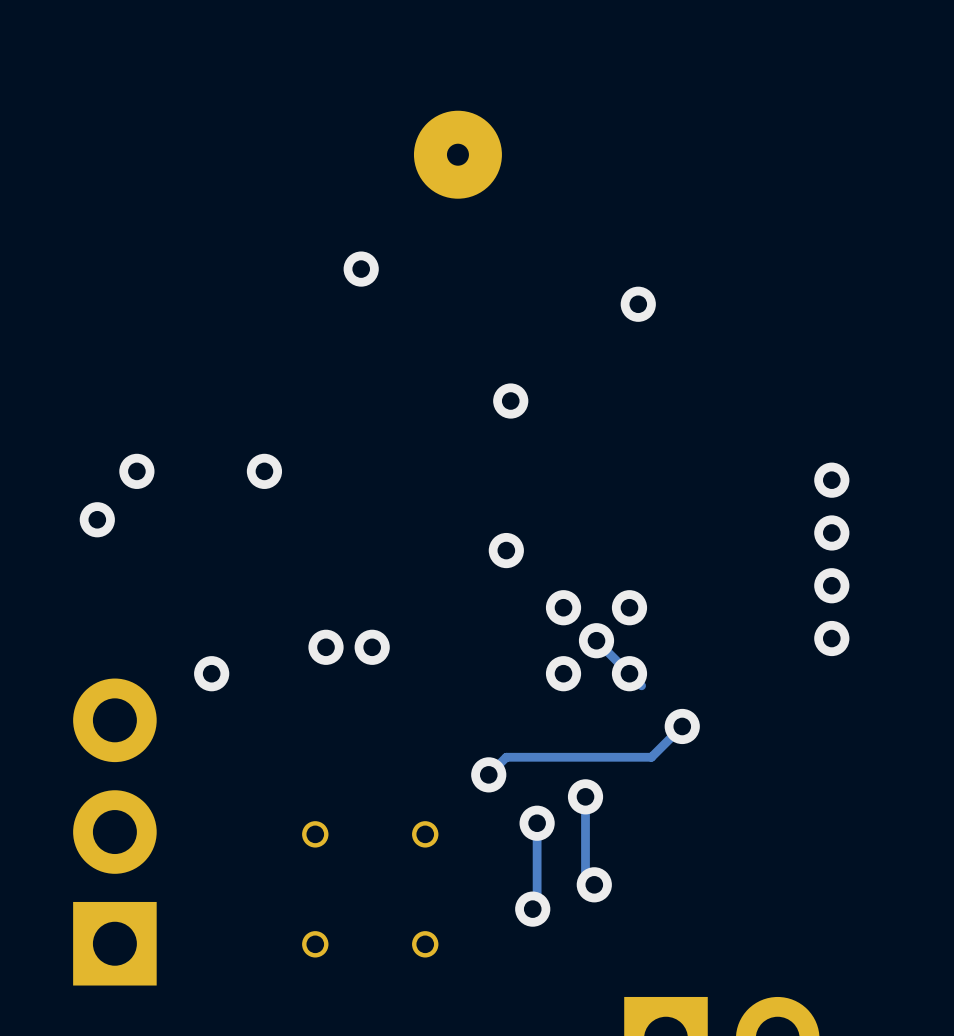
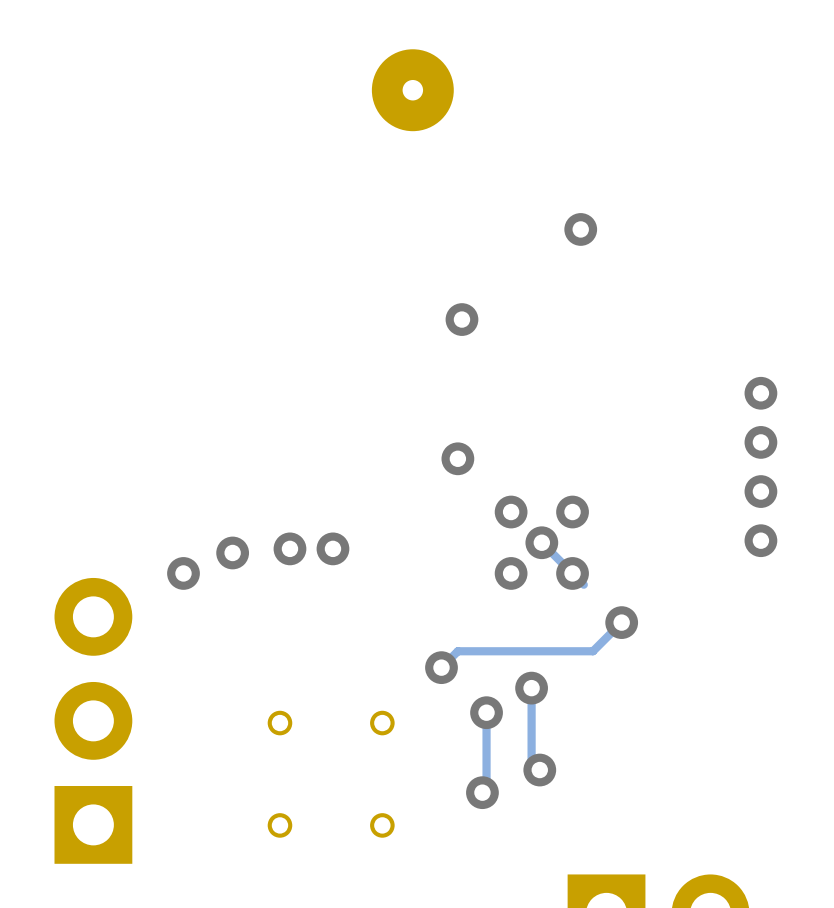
via: (361, 269) -> none
via: (136, 471) -> none
via: (264, 471) -> none
via: (97, 519) -> none
via: none -> (232, 552)

